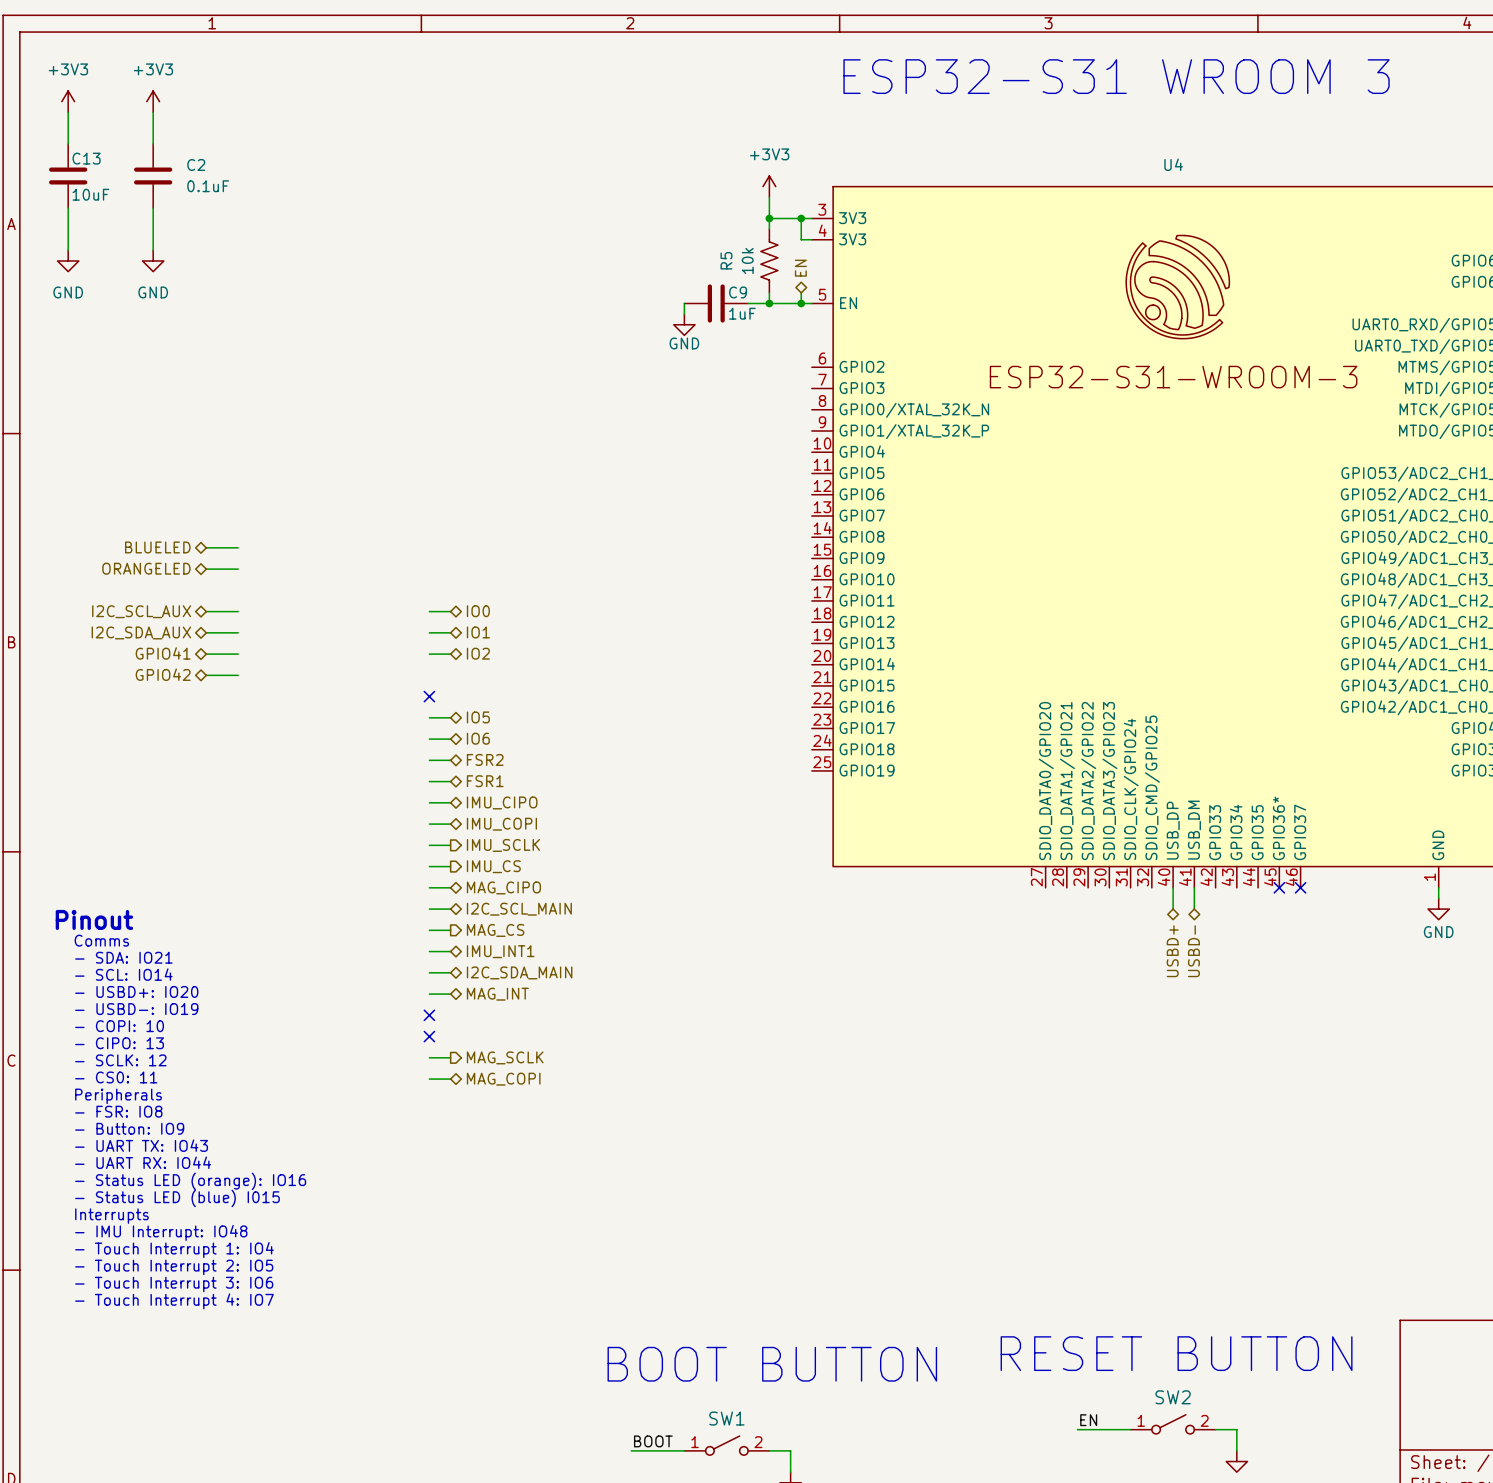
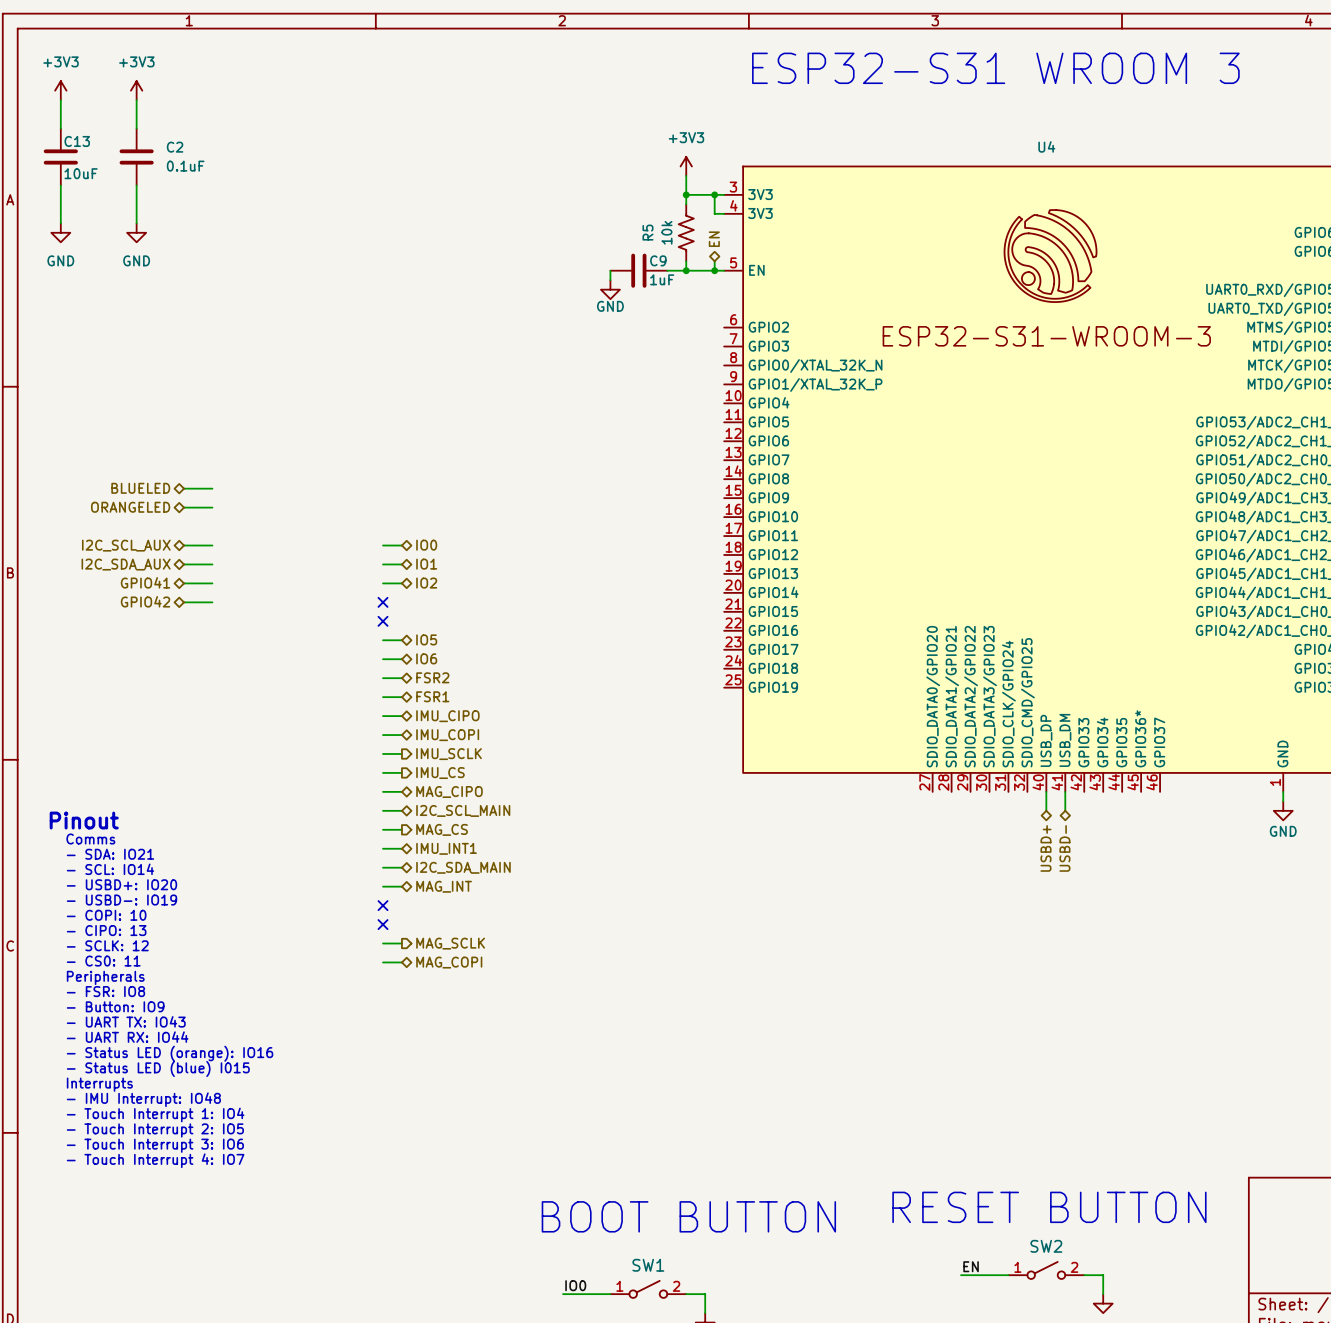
no-connect mark: none -> (383, 602)
no-connect mark: (1279, 887) -> none
no-connect mark: (1300, 887) -> none
label: BOOT (653, 1441) -> IO0 (575, 1285)

